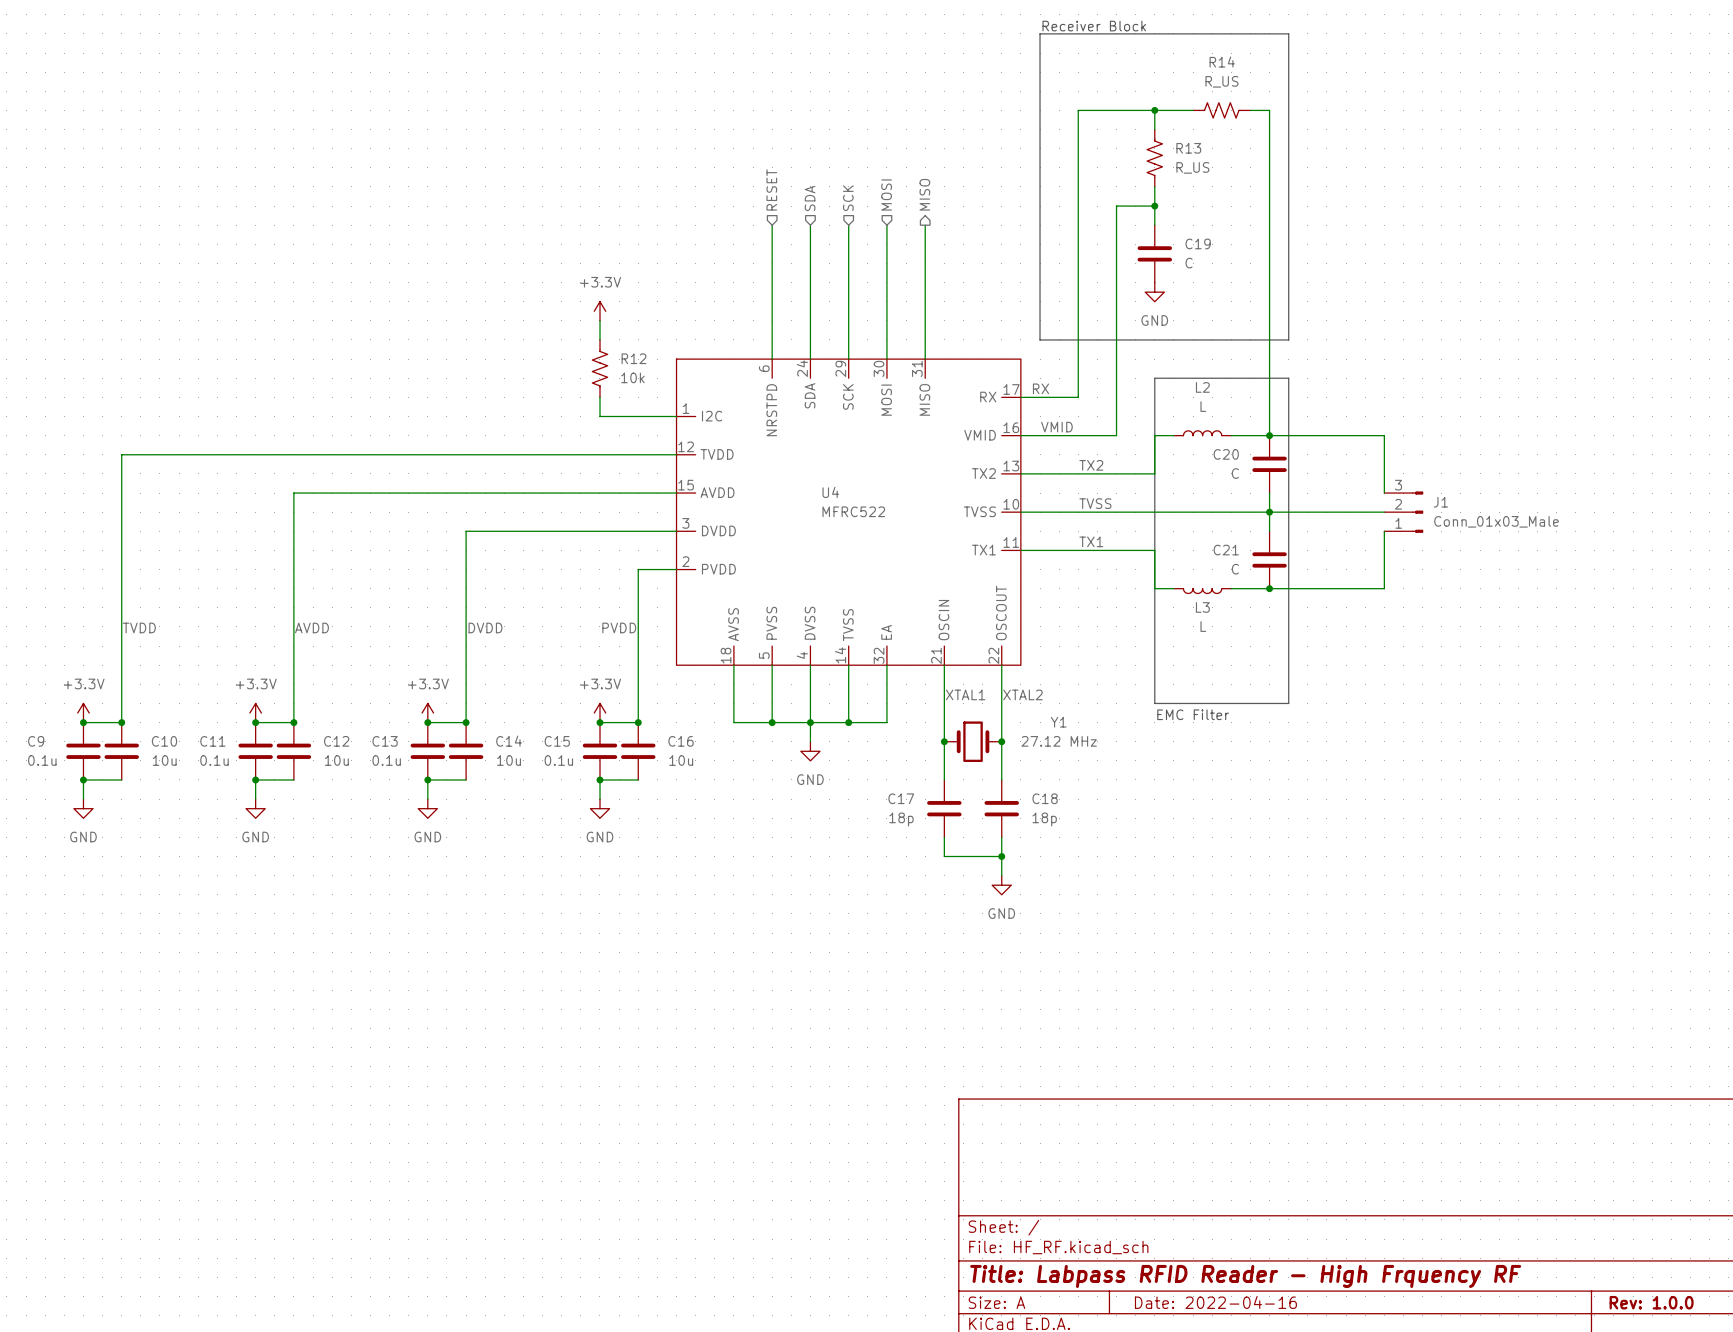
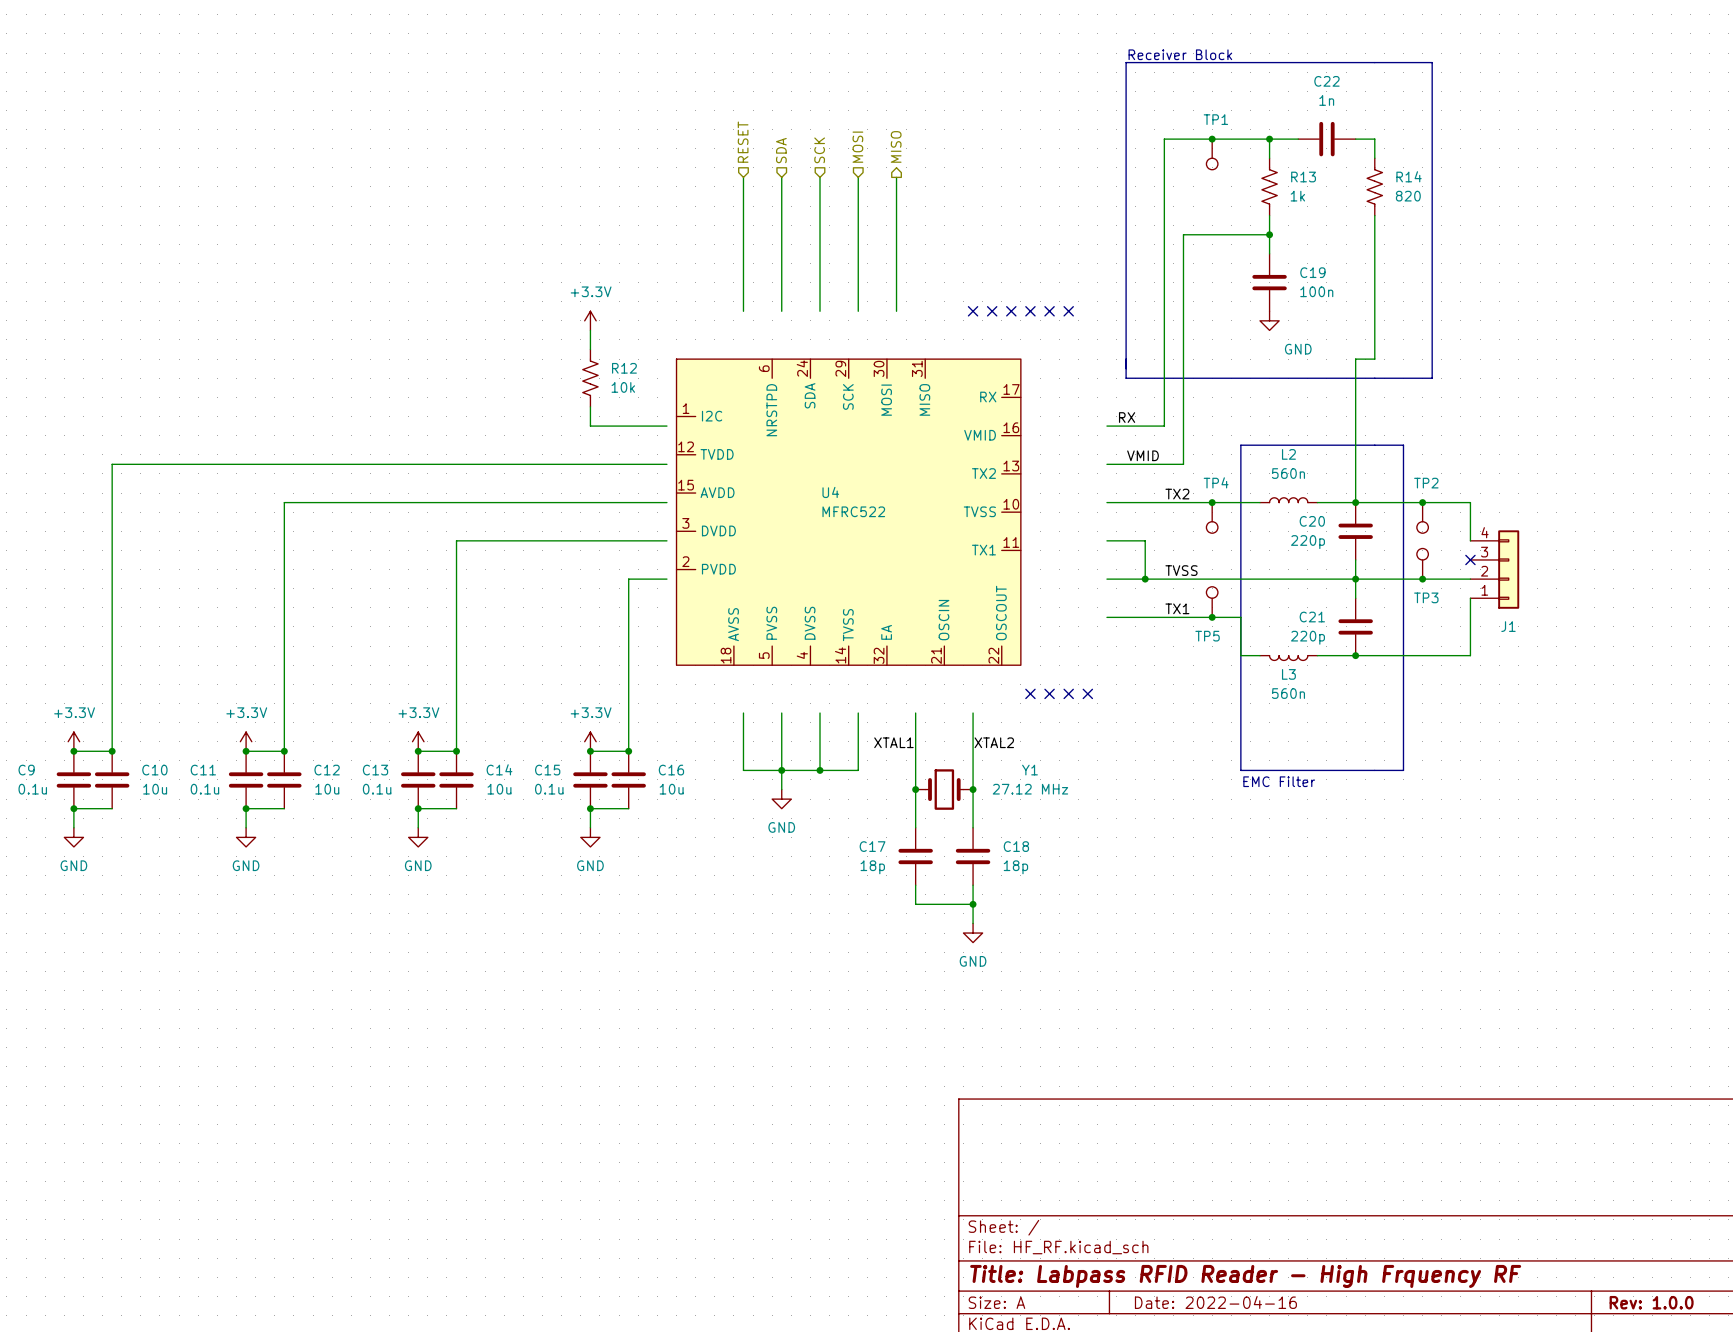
text position: Receiver Block (1094, 26) -> Receiver Block (1180, 54)
line: (1040, 33) (1288, 33) (1288, 339) (1040, 339) (1040, 33) -> none
R14 name position: R14 (1222, 62) -> R14 (1409, 176)
R14 value: R_US (1221, 81) -> 820 (1408, 196)
wire: (1154, 110) (1154, 129) -> none
junction: (1154, 110) -> none
wire: (1193, 110) (1078, 110) (1078, 397) (1020, 397) -> none
R14 rotation: 0° (1221, 110) -> 90° clockwise (1374, 186)
R14 position: (1221, 110) -> (1374, 186)
wire: (1250, 110) (1269, 110) (1269, 139) -> none
junction: none -> (1212, 139)
junction: none -> (1269, 139)
wire: none -> (1298, 139) (1164, 139) (1164, 426) (1106, 426)
C22: none -> 1n (1326, 139)
wire: none -> (1355, 139) (1374, 139) (1374, 158)
TP1: none -> (1212, 154)
R13 position: (1154, 158) -> (1269, 186)
R13 value: R_US (1192, 167) -> 1k (1297, 196)
wire: (1154, 186) (1154, 225) -> none
hierarchical label position: RESET (771, 189) -> RESET (743, 142)
hierarchical label position: MOSI (886, 194) -> MOSI (857, 147)
hierarchical label position: MISO (924, 194) -> MISO (896, 146)
hierarchical label position: SDA (810, 198) -> SDA (781, 150)
hierarchical label position: SCK (848, 198) -> SCK (819, 150)
wire: (1154, 206) (1116, 206) (1116, 435) (1020, 435) -> none
junction: (1154, 206) -> none
wire: none -> (1374, 215) (1374, 359) (1355, 359) (1355, 502)
wire: (772, 225) (772, 359) -> (743, 177) (743, 311)
wire: (810, 225) (810, 359) -> (781, 177) (781, 311)
wire: (848, 225) (848, 359) -> (820, 177) (820, 311)
wire: (886, 225) (886, 359) -> (858, 177) (858, 311)
wire: (925, 225) (925, 359) -> (896, 177) (896, 311)
wire: none -> (1269, 234) (1183, 234) (1183, 464) (1106, 464)
junction: none -> (1269, 234)
C19 position: (1154, 253) -> (1269, 282)
wire: (1269, 253) (1269, 435) -> none
C19 value: C (1189, 263) -> 100n (1316, 291)
power symbol position: GND (1154, 292) -> GND (1269, 320)
power symbol position: +3.3V (599, 311) -> +3.3V (590, 320)
no-connect mark: none -> (973, 311)
no-connect mark: none -> (992, 311)
no-connect mark: none -> (1011, 311)
no-connect mark: none -> (1030, 311)
no-connect mark: none -> (1049, 311)
no-connect mark: none -> (1068, 311)
wire: (599, 320) (599, 339) -> (590, 330) (590, 349)
power symbol text position: GND (1154, 320) -> GND (1298, 349)
R12 position: (599, 368) -> (590, 378)
line: (1154, 378) (1154, 703) (1288, 703) (1288, 378) -> (1154, 378) (1126, 378) (1126, 62) (1432, 62) (1432, 378) (1288, 378)
label position: RX (1040, 388) -> RX (1127, 417)
wire: (599, 397) (599, 416) (676, 416) -> (590, 406) (590, 426) (666, 426)
L2 value: L (1203, 406) -> 560n (1288, 473)
label position: VMID (1056, 427) -> VMID (1143, 455)
L2 position: (1202, 433) -> (1288, 500)
wire: (1173, 435) (1154, 435) (1154, 473) (1020, 473) -> none
wire: (1231, 435) (1384, 435) (1384, 493) -> none
junction: (1269, 435) -> none
line: none -> (1240, 445) (1240, 770) (1403, 770) (1403, 445) (1240, 445)
wire: (676, 454) (121, 454) (121, 722) (83, 722) -> none
wire: none -> (666, 464) (112, 464) (112, 751) (73, 751)
C20 position: (1269, 464) -> (1355, 531)
label position: TX2 (1091, 465) -> TX2 (1177, 494)
C20 value: C (1235, 473) -> 220p (1307, 542)
J1 symbol: [1384, 491, 1424, 533] -> [1470, 530, 1520, 609]
wire: (676, 493) (293, 493) (293, 722) (255, 722) -> none
wire: (1269, 493) (1269, 531) -> (1355, 559) (1355, 598)
wire: none -> (666, 502) (284, 502) (284, 751) (246, 751)
wire: none -> (1106, 502) (1260, 502)
junction: none -> (1212, 502)
wire: none -> (1317, 502) (1470, 502) (1470, 540)
junction: none -> (1355, 502)
junction: none -> (1422, 502)
J1 name position: J1 (1440, 502) -> J1 (1508, 626)
label position: TVSS (1095, 503) -> TVSS (1181, 570)
wire: (1020, 512) (1384, 512) -> (1106, 579) (1470, 579)
junction: (1269, 512) -> none
TP4: none -> (1212, 517)
TP2: none -> (1422, 517)
J1 value: Conn_01x03_Male (1496, 521) -> none
wire: (676, 531) (466, 531) (466, 722) (427, 722) -> none
wire: (1384, 531) (1384, 588) (1231, 588) -> (1470, 598) (1470, 655) (1317, 655)
wire: none -> (666, 540) (456, 540) (456, 751) (418, 751)
wire: none -> (1106, 540) (1145, 540) (1145, 579)
label position: TX1 (1091, 541) -> TX1 (1177, 608)
wire: (1020, 550) (1154, 550) (1154, 588) (1173, 588) -> (1106, 617) (1240, 617) (1240, 655) (1260, 655)
C21 position: (1269, 559) -> (1355, 626)
no-connect mark: none -> (1470, 559)
TP3: none -> (1422, 563)
wire: (676, 569) (638, 569) (638, 722) (599, 722) -> none
C21 value: C (1235, 569) -> 220p (1307, 637)
wire: none -> (666, 579) (628, 579) (628, 751) (590, 751)
junction: none -> (1145, 579)
junction: none -> (1355, 579)
junction: none -> (1422, 579)
junction: (1269, 588) -> none
L3 position: (1202, 591) -> (1288, 658)
TP5: none -> (1212, 602)
junction: none -> (1212, 617)
L3 value: L (1203, 626) -> 560n (1288, 693)
label: TVDD (139, 627) -> none
label: AVDD (311, 627) -> none
label: DVDD (485, 627) -> none
label: PVDD (619, 627) -> none
junction: none -> (1355, 655)
wire: (733, 665) (733, 722) (886, 722) (886, 665) -> none
wire: (772, 665) (772, 722) -> none
wire: (810, 665) (810, 741) -> (781, 713) (781, 789)
wire: (848, 665) (848, 722) -> (820, 713) (820, 770)
wire: (944, 665) (944, 779) -> (915, 713) (915, 827)
wire: (1001, 665) (1001, 779) -> (973, 713) (973, 827)
no-connect mark: none -> (1030, 693)
no-connect mark: none -> (1049, 693)
no-connect mark: none -> (1068, 693)
no-connect mark: none -> (1087, 693)
label position: XTAL1 (965, 694) -> XTAL1 (893, 742)
label position: XTAL2 (1022, 694) -> XTAL2 (994, 742)
power symbol position: +3.3V (83, 713) -> +3.3V (73, 741)
power symbol position: +3.3V (255, 713) -> +3.3V (246, 741)
power symbol position: +3.3V (427, 713) -> +3.3V (418, 741)
power symbol position: +3.3V (599, 713) -> +3.3V (590, 741)
wire: none -> (743, 713) (743, 770) (858, 770) (858, 713)
text position: EMC Filter (1193, 714) -> EMC Filter (1279, 781)
junction: (83, 722) -> none
junction: (121, 722) -> none
junction: (255, 722) -> none
junction: (293, 722) -> none
junction: (427, 722) -> none
junction: (466, 722) -> none
junction: (599, 722) -> none
junction: (638, 722) -> none
junction: (772, 722) -> none
junction: (810, 722) -> none
junction: (848, 722) -> none
junction: (944, 741) -> none
Y1 position: (973, 741) -> (944, 789)
junction: (1001, 741) -> none
junction: none -> (73, 751)
C9 position: (83, 751) -> (73, 779)
junction: none -> (112, 751)
C10 position: (121, 751) -> (112, 779)
junction: none -> (246, 751)
C11 position: (255, 751) -> (246, 779)
junction: none -> (284, 751)
C12 position: (293, 751) -> (284, 779)
junction: none -> (418, 751)
C13 position: (427, 751) -> (418, 779)
junction: none -> (456, 751)
C14 position: (466, 751) -> (456, 779)
junction: none -> (590, 751)
C15 position: (599, 751) -> (590, 779)
junction: none -> (628, 751)
C16 position: (638, 751) -> (628, 779)
power symbol position: GND (810, 751) -> GND (781, 799)
junction: none -> (781, 770)
junction: none -> (820, 770)
junction: (83, 779) -> none
wire: (121, 779) (83, 779) (83, 799) -> (112, 808) (73, 808) (73, 827)
junction: (255, 779) -> none
wire: (293, 779) (255, 779) (255, 799) -> (284, 808) (246, 808) (246, 827)
junction: (427, 779) -> none
wire: (466, 779) (427, 779) (427, 799) -> (456, 808) (418, 808) (418, 827)
junction: (599, 779) -> none
wire: (638, 779) (599, 779) (599, 799) -> (628, 808) (590, 808) (590, 827)
junction: none -> (915, 789)
junction: none -> (973, 789)
junction: none -> (73, 808)
power symbol position: GND (83, 808) -> GND (73, 837)
junction: none -> (246, 808)
power symbol position: GND (255, 808) -> GND (246, 837)
junction: none -> (418, 808)
power symbol position: GND (427, 808) -> GND (418, 837)
junction: none -> (590, 808)
power symbol position: GND (599, 808) -> GND (590, 837)
C17 position: (944, 808) -> (915, 856)
C18 position: (1001, 808) -> (973, 856)
wire: (944, 837) (944, 856) (1001, 856) -> (915, 885) (915, 904) (973, 904)
wire: (1001, 837) (1001, 875) -> (973, 885) (973, 923)
junction: (1001, 856) -> none
power symbol position: GND (1001, 885) -> GND (973, 933)
junction: none -> (973, 904)

